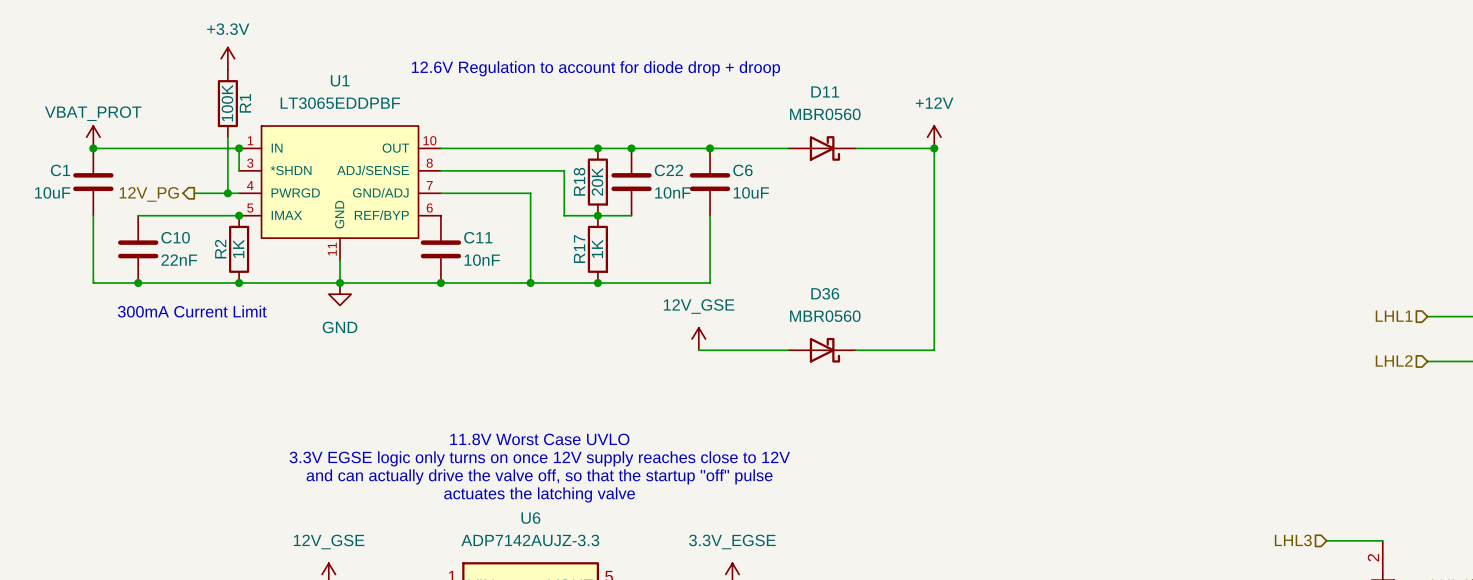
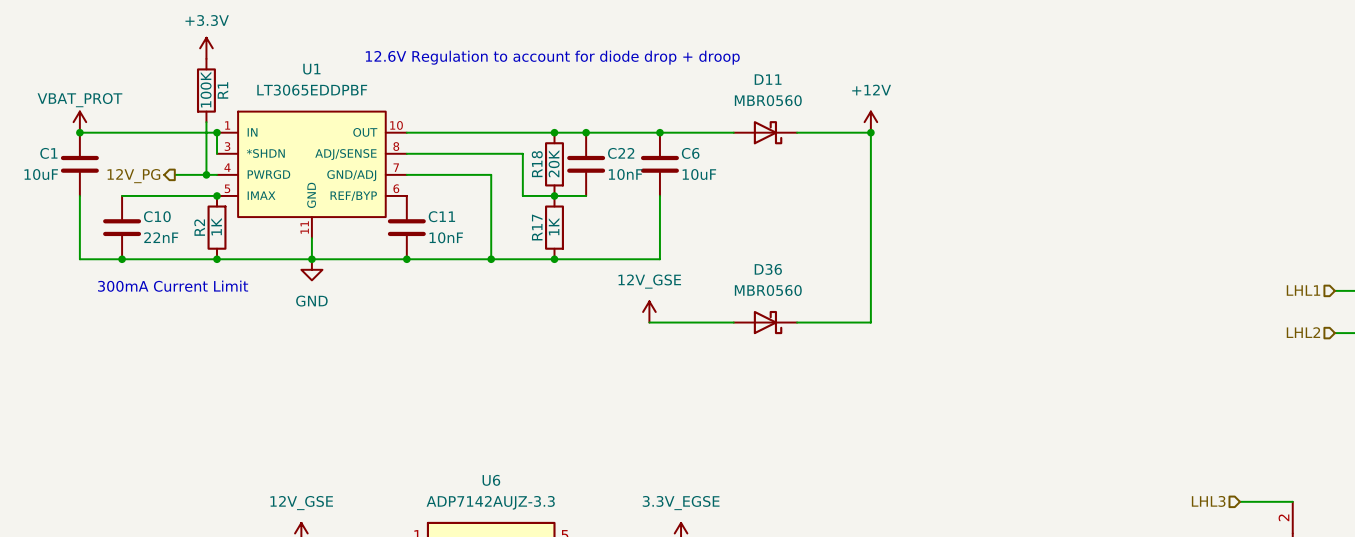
text: 11.8V Worst Case UVLO (539, 439) -> none
text: 3.3V EGSE logic only turns on once 12V supply reaches close to 12V (539, 458) -> none
text: and can actually drive the valve off, so that the startup "off" pulse (539, 476) -> none
text: actuates the latching valve (539, 494) -> none

